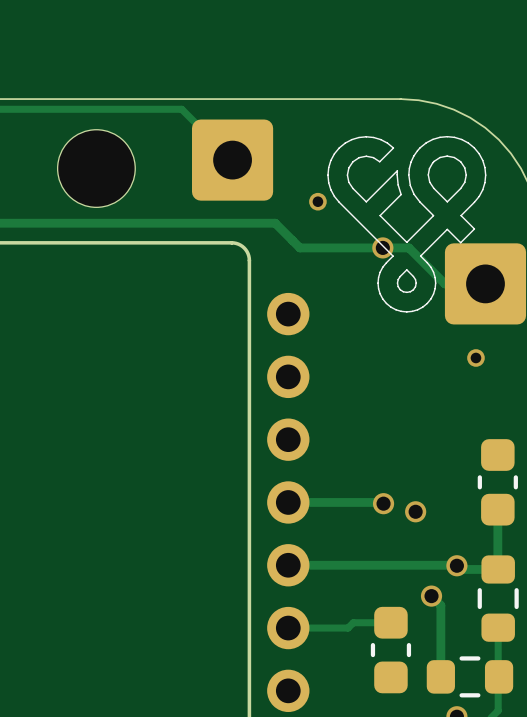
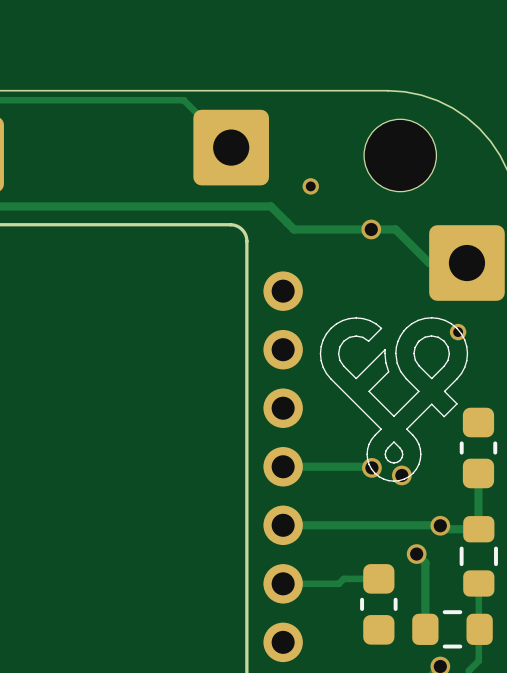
part position: (96, 168) -> (400, 155)
drawing position: (406, 224) -> (393, 399)

